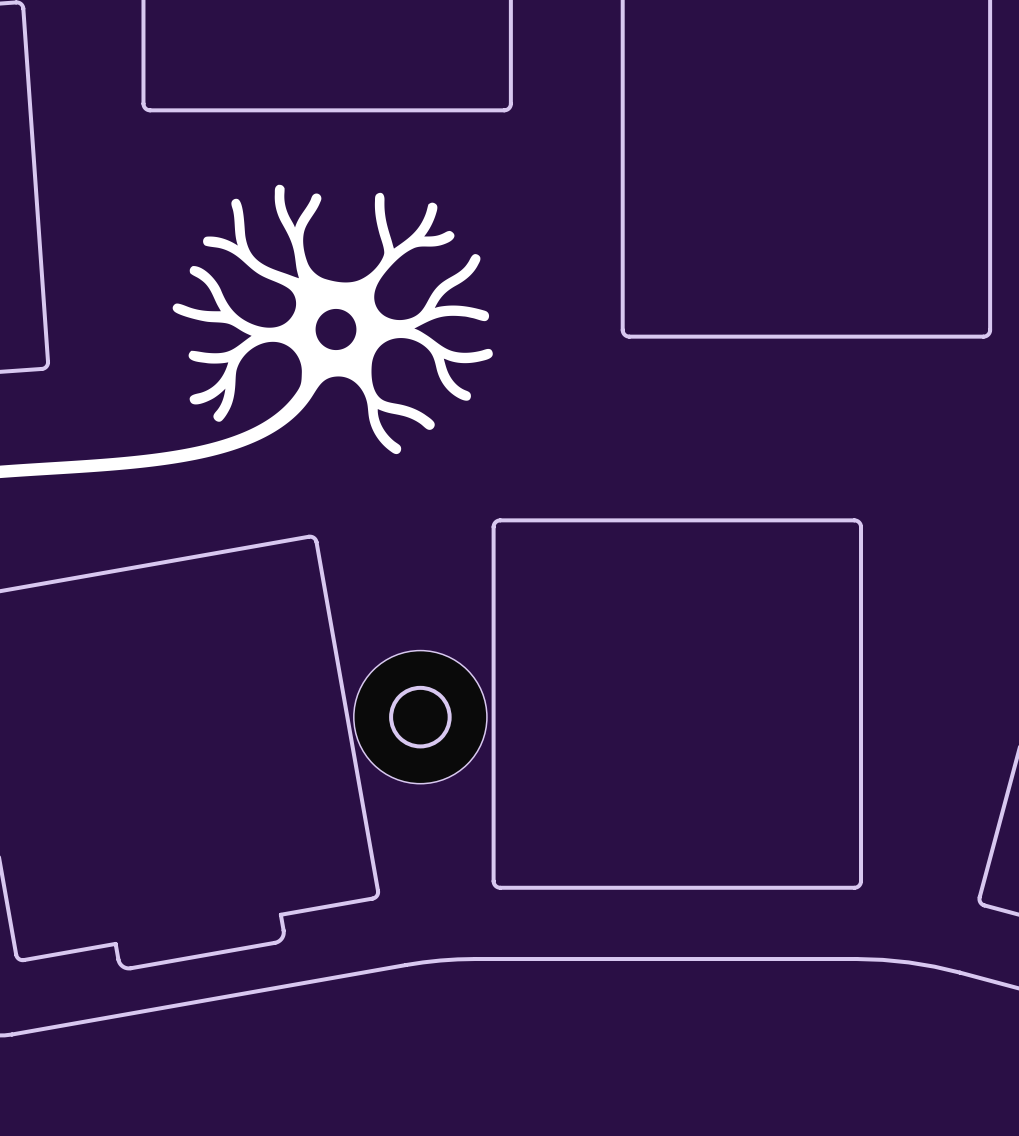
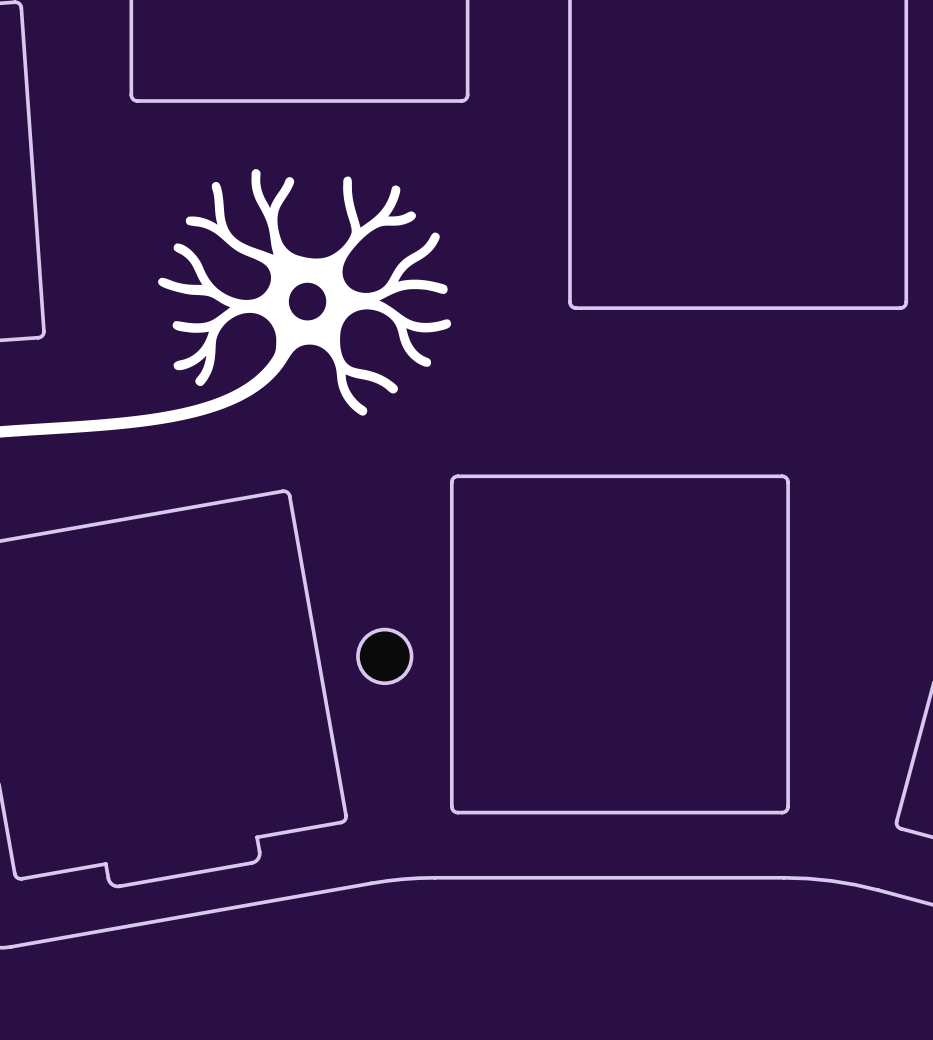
part footprint: [353, 650, 487, 784] -> [357, 629, 412, 684]

